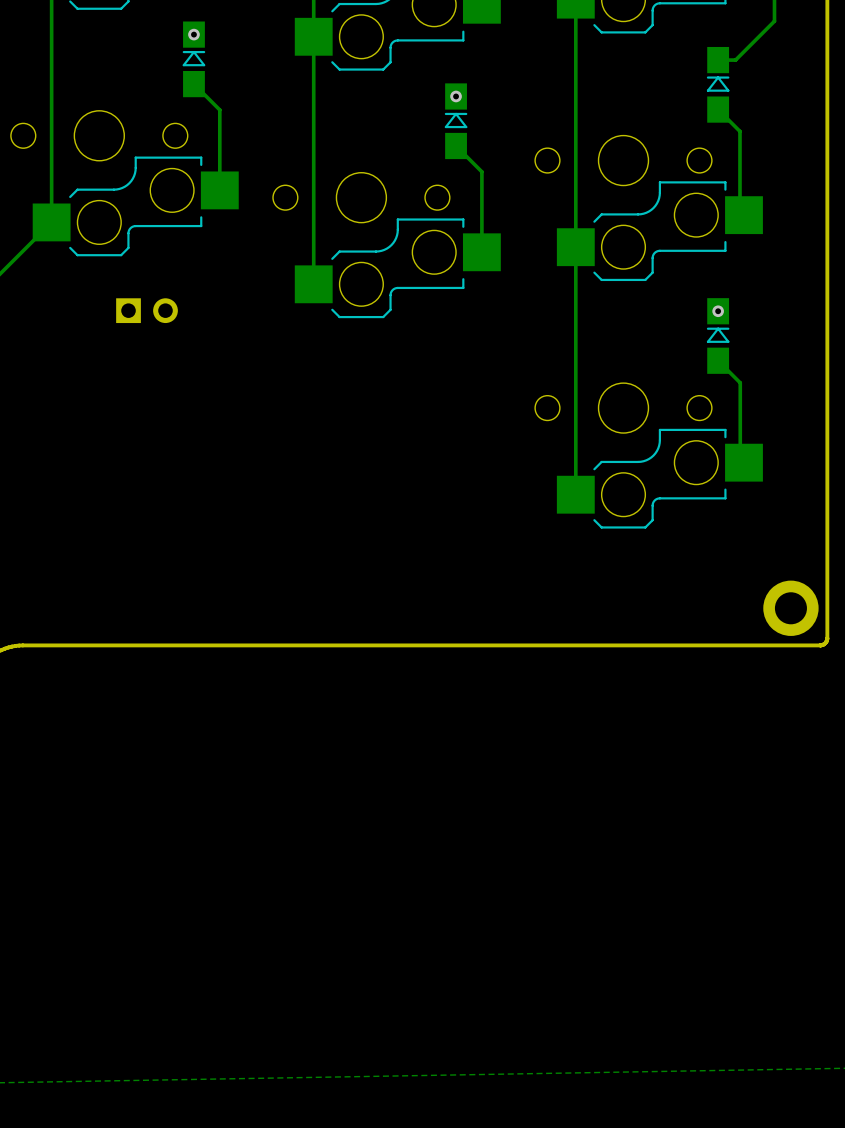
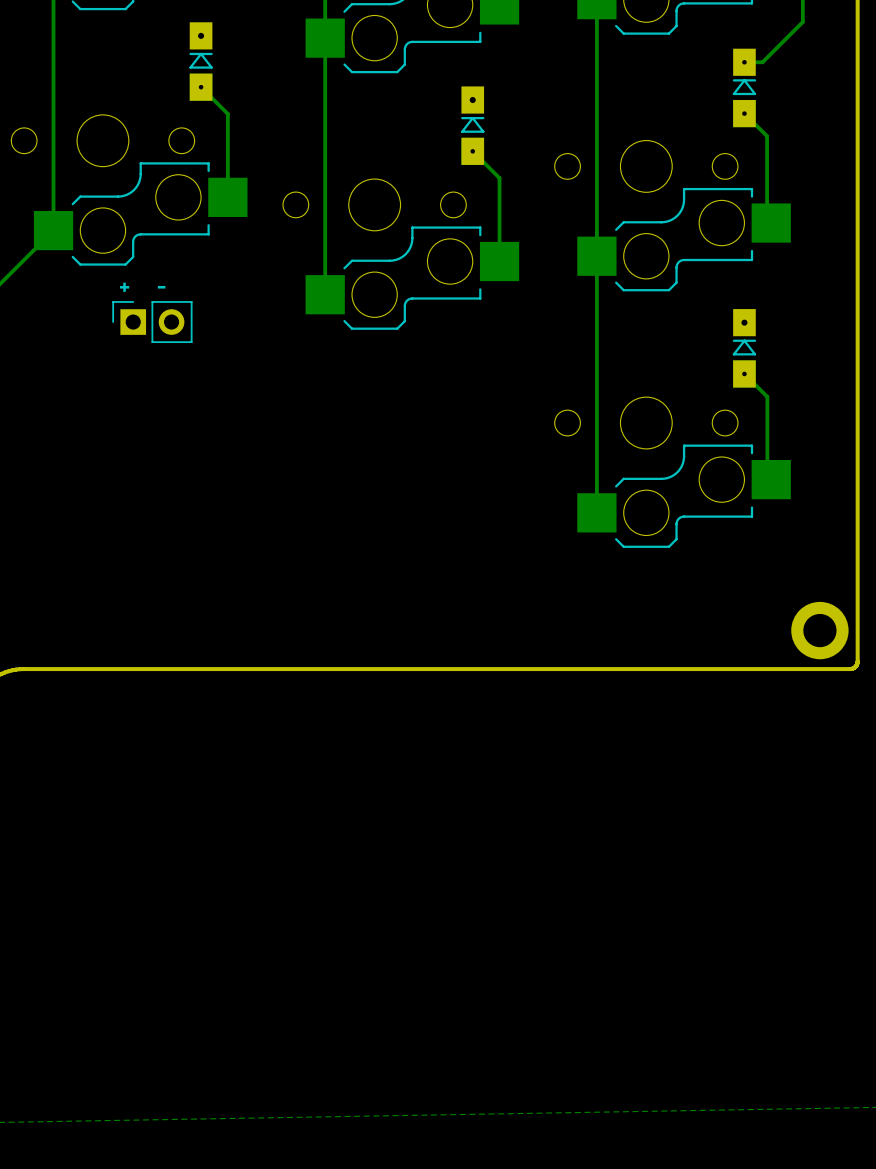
part footprint: [182, 21, 206, 98] -> [189, 22, 213, 101]
part footprint: [706, 46, 730, 123] -> [732, 48, 757, 128]
part footprint: [444, 83, 468, 160] -> [461, 86, 485, 165]
text: none -> + (124, 287)
text: none -> - (161, 287)
part footprint: [116, 298, 178, 324] -> [112, 301, 193, 344]
part footprint: [706, 298, 730, 374] -> [732, 309, 757, 388]

